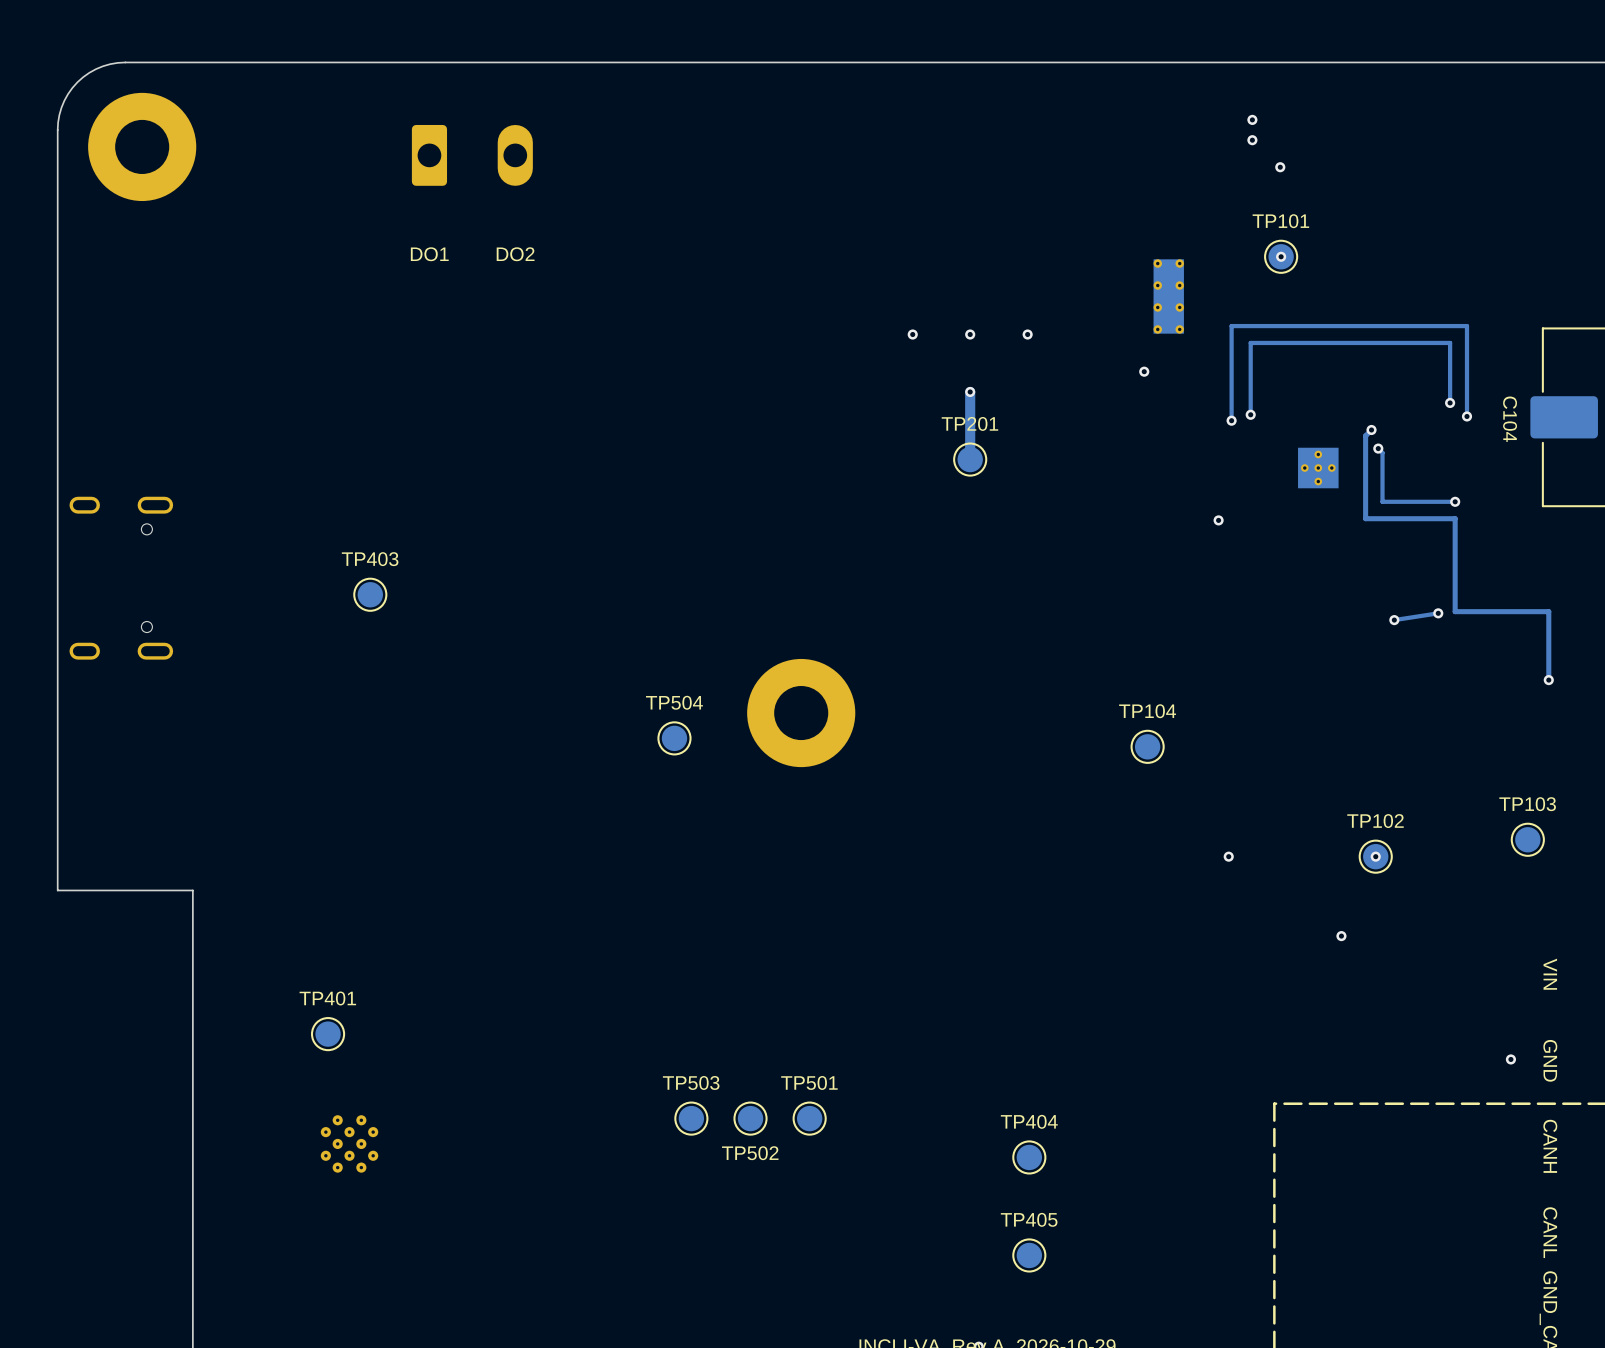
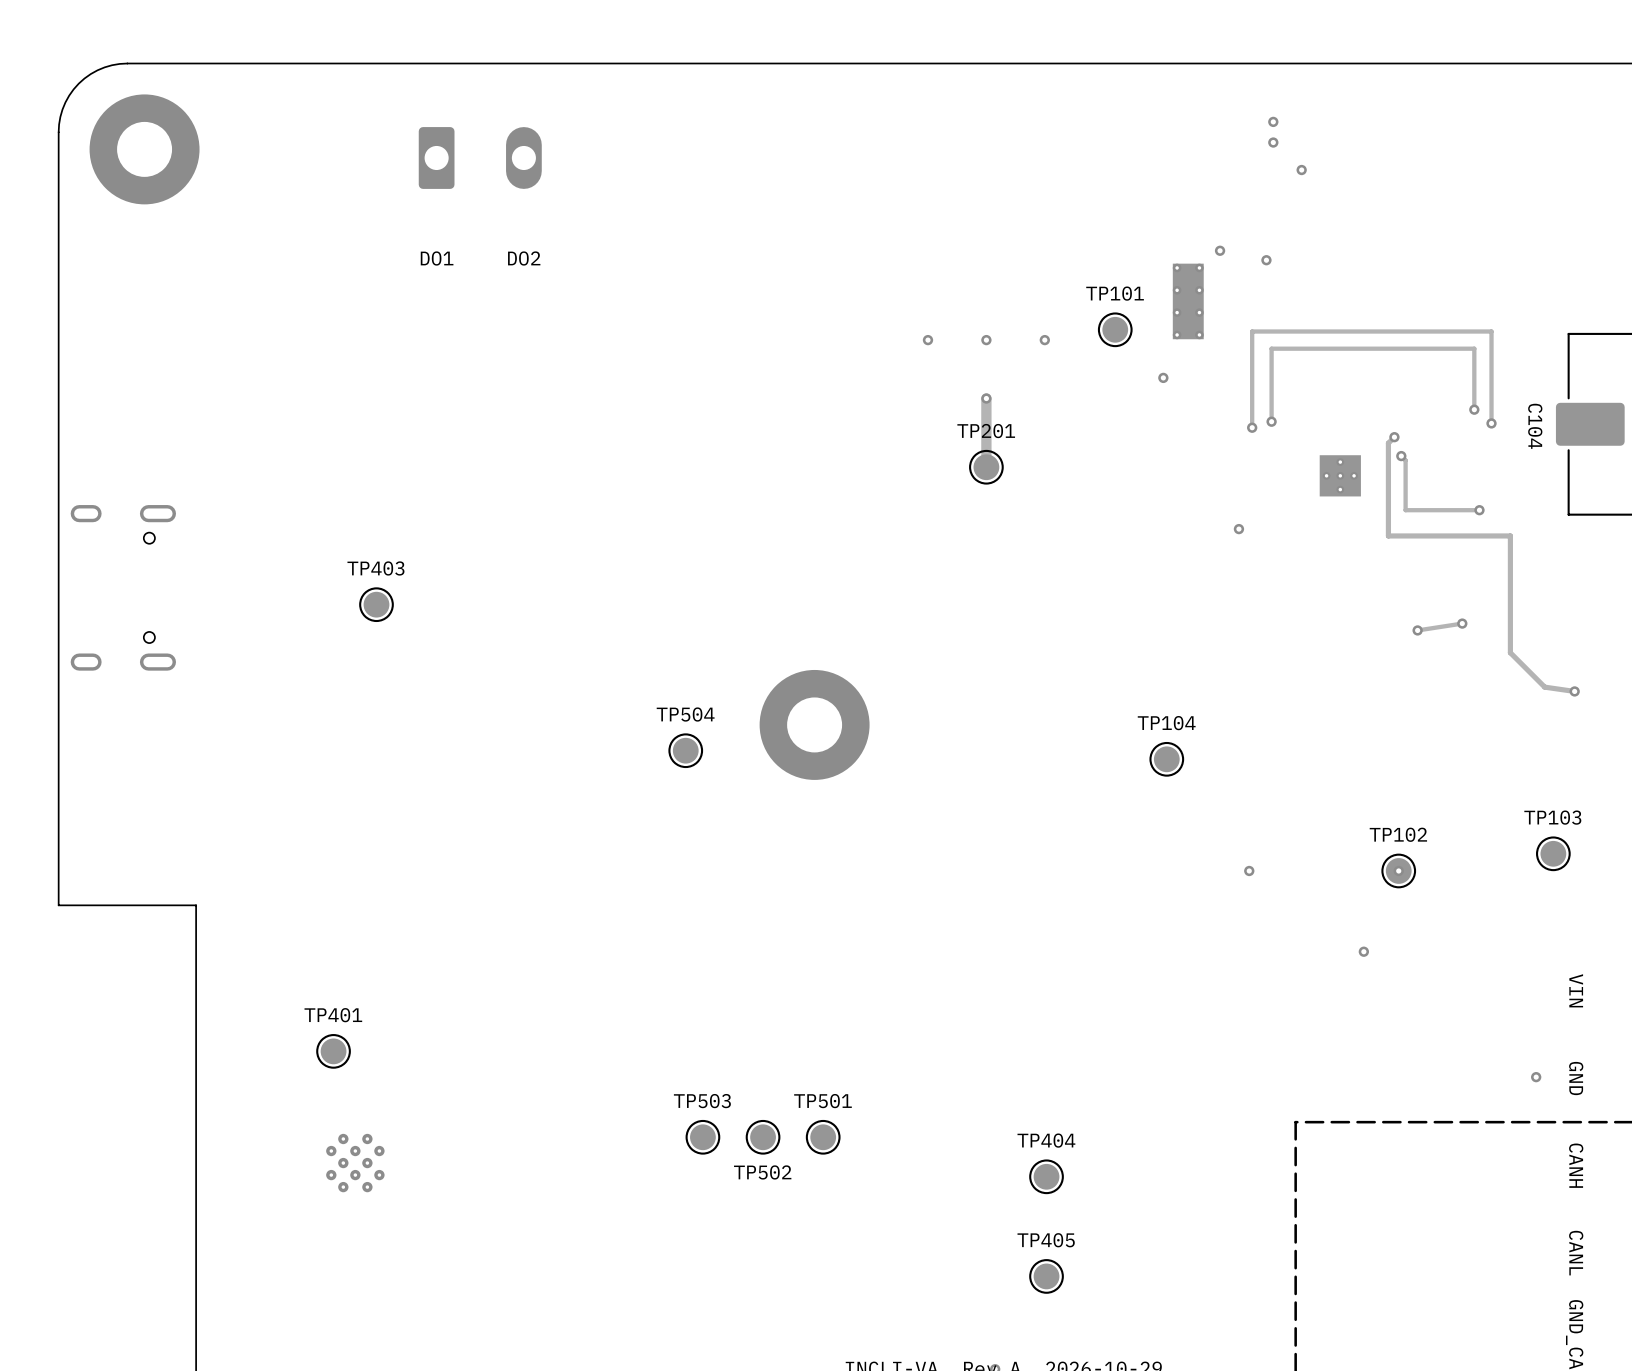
via: none -> (1220, 250)
TP101 position: (1281, 256) -> (1115, 329)
via position: (1281, 256) -> (1266, 260)
track: (1365, 518) (1455, 518) (1455, 611) (1548, 611) (1548, 680) -> (1388, 527) (1388, 535) (1510, 535) (1510, 652) (1544, 687) (1574, 691)

